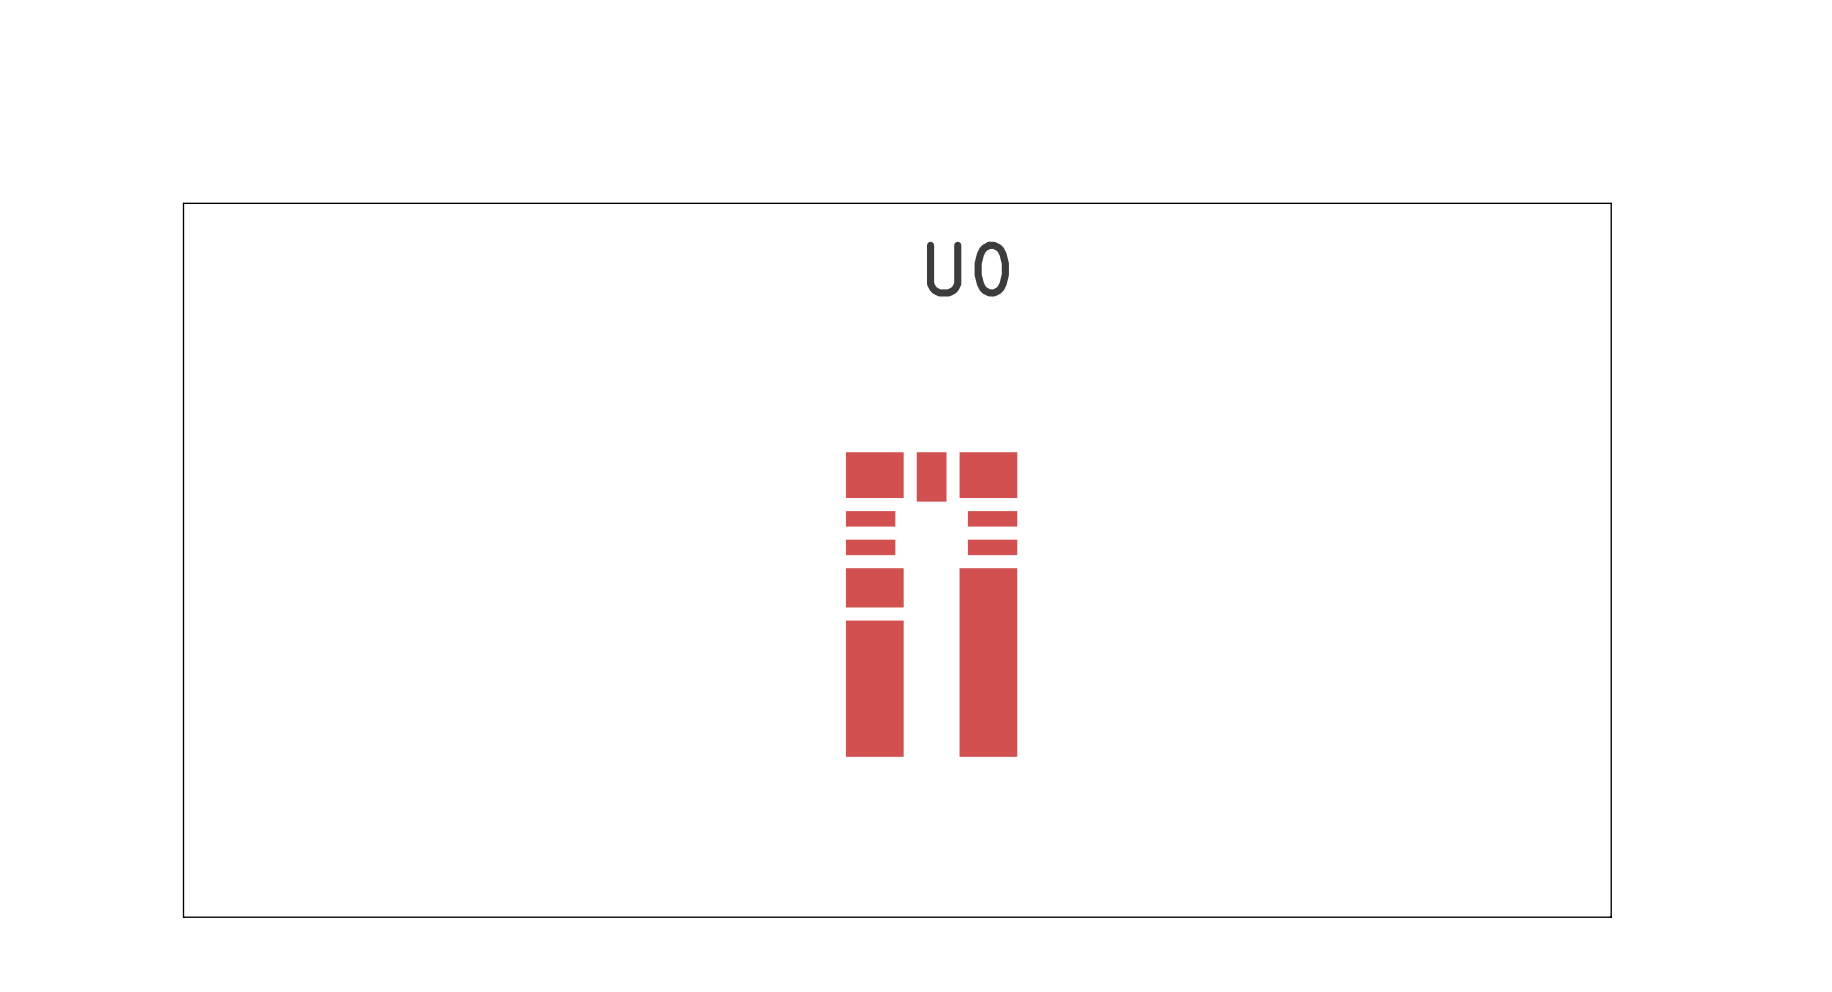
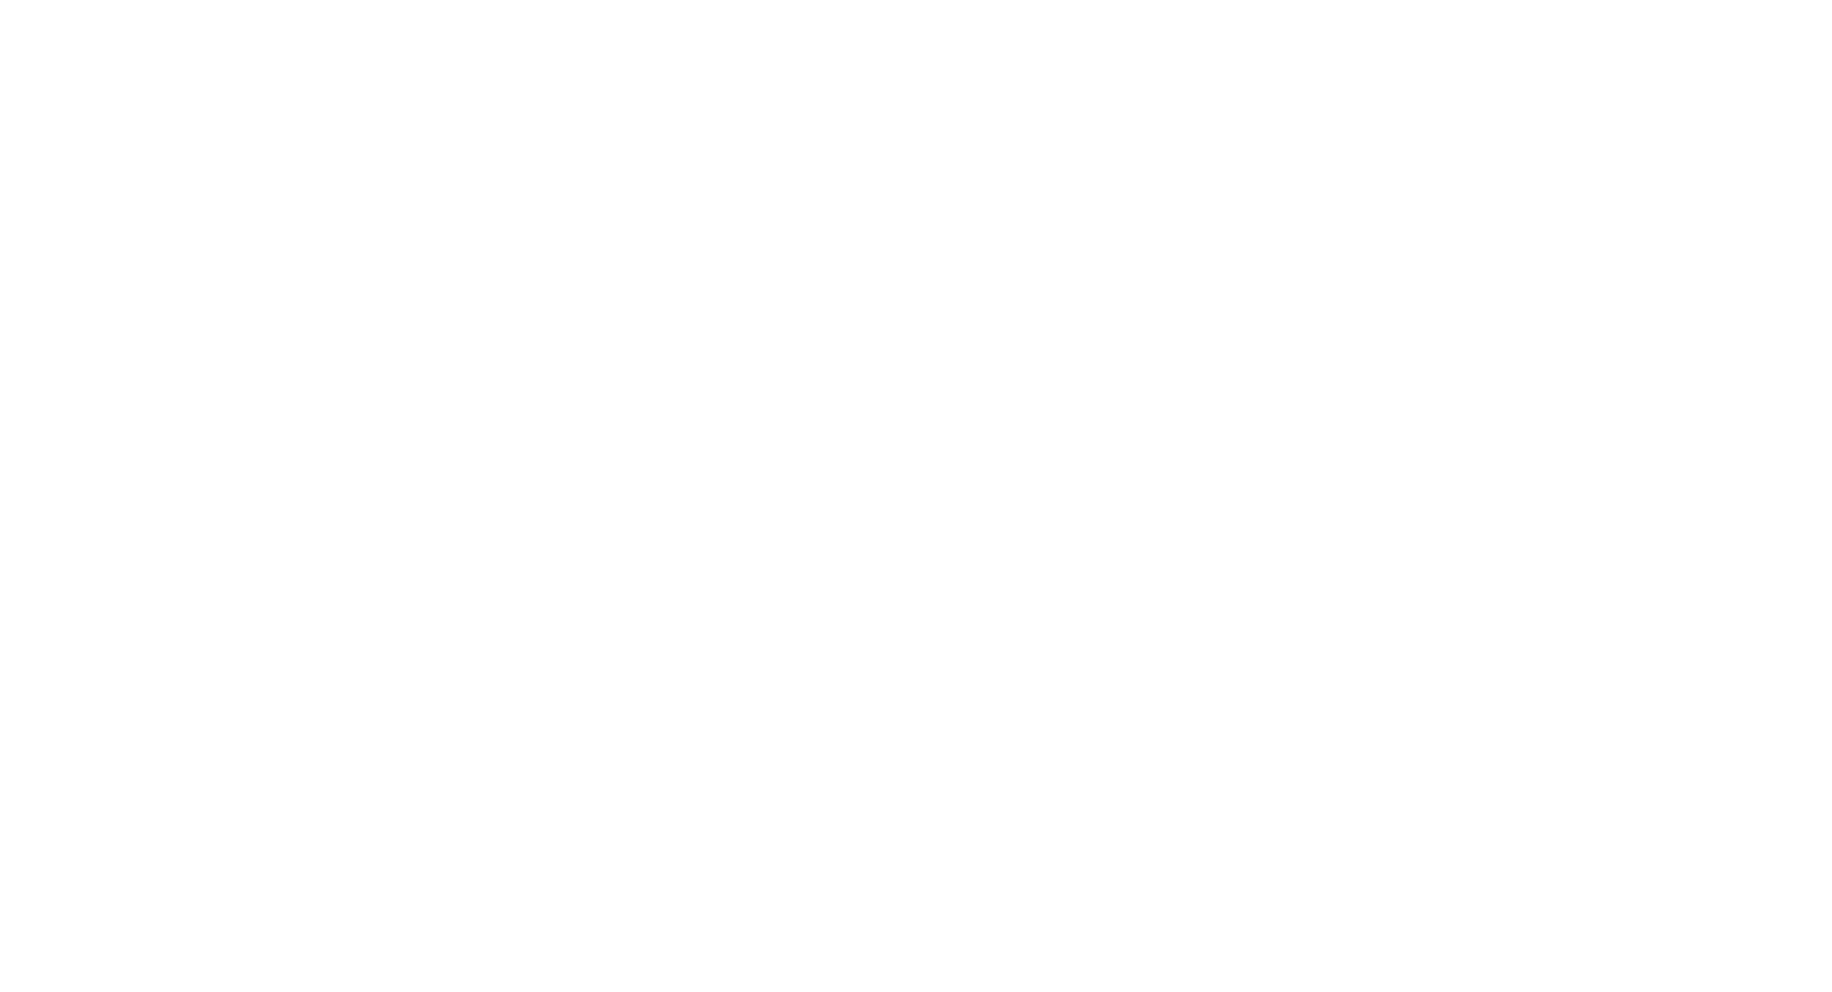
board edge: (183, 203) (183, 917) (1611, 917) (1611, 203) (183, 203) -> none
U0: (931, 604) -> none

